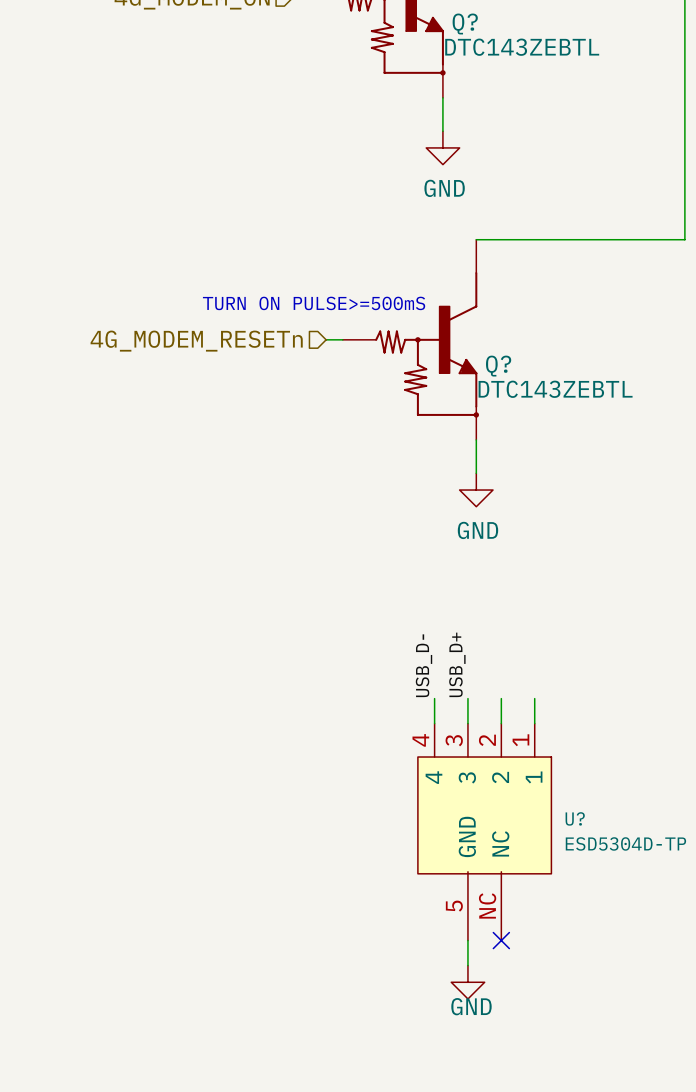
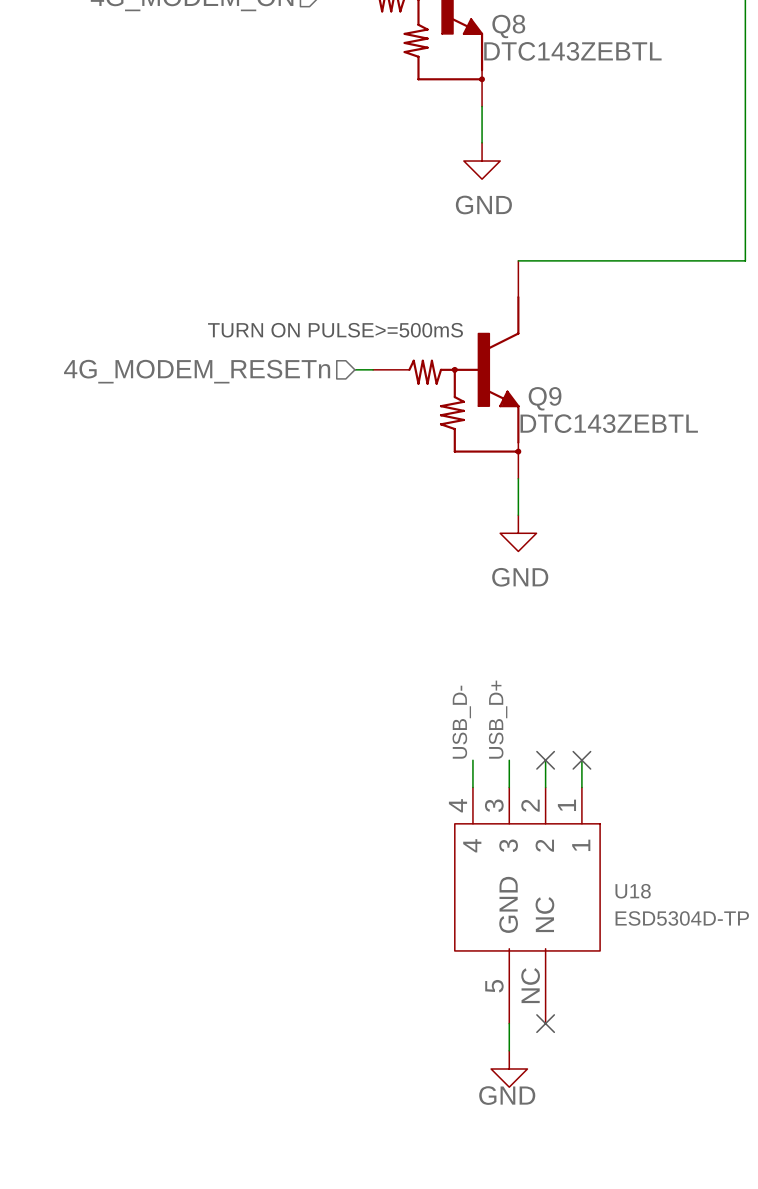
Q? name: Q? (465, 23) -> Q8 (508, 26)
Q? name: Q? (498, 366) -> Q9 (545, 398)
no-connect mark: none -> (545, 760)
no-connect mark: none -> (581, 760)
U? name: U? (575, 818) -> U18 (633, 891)

